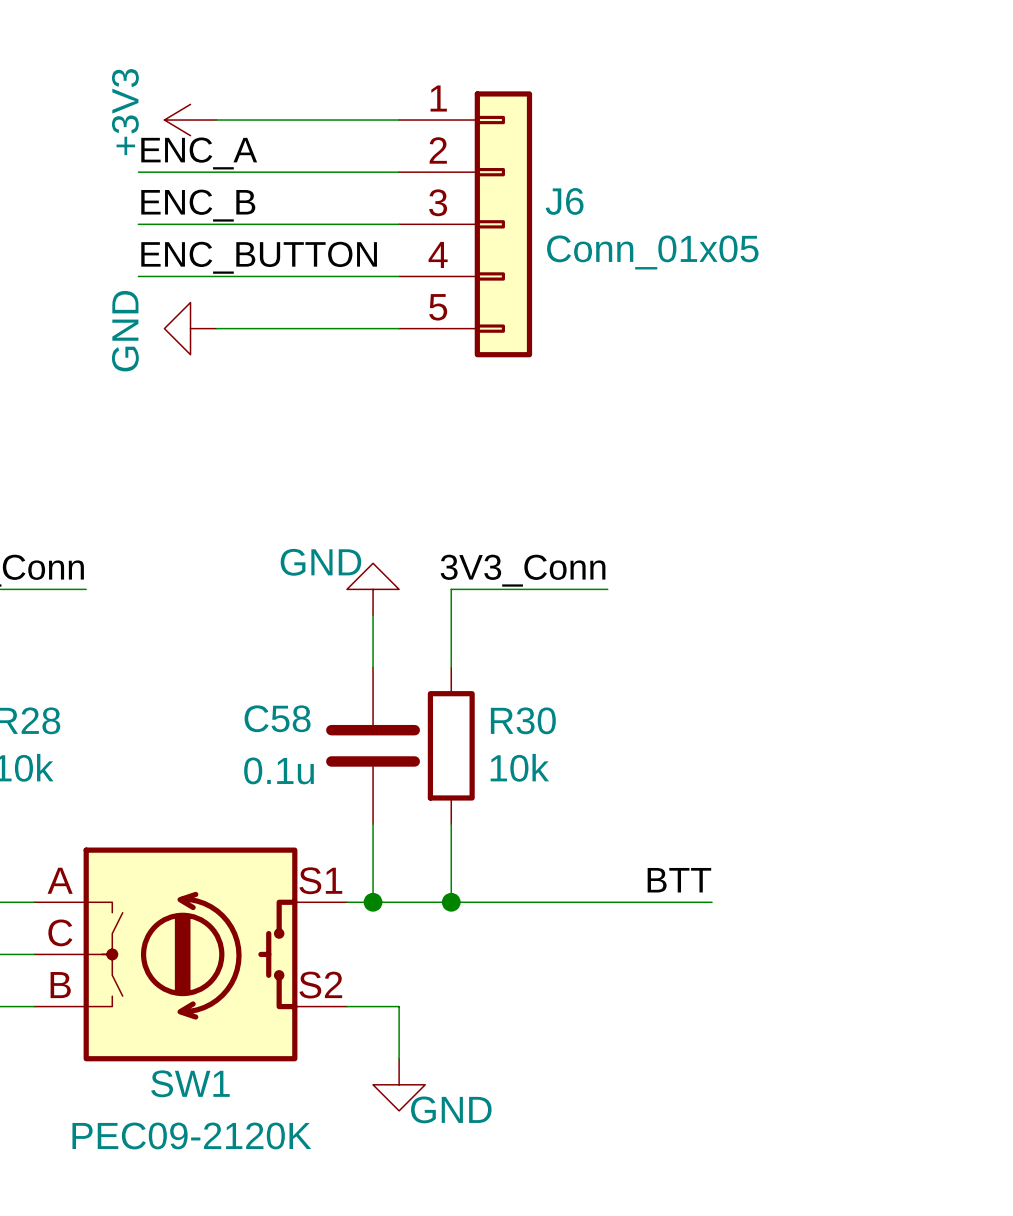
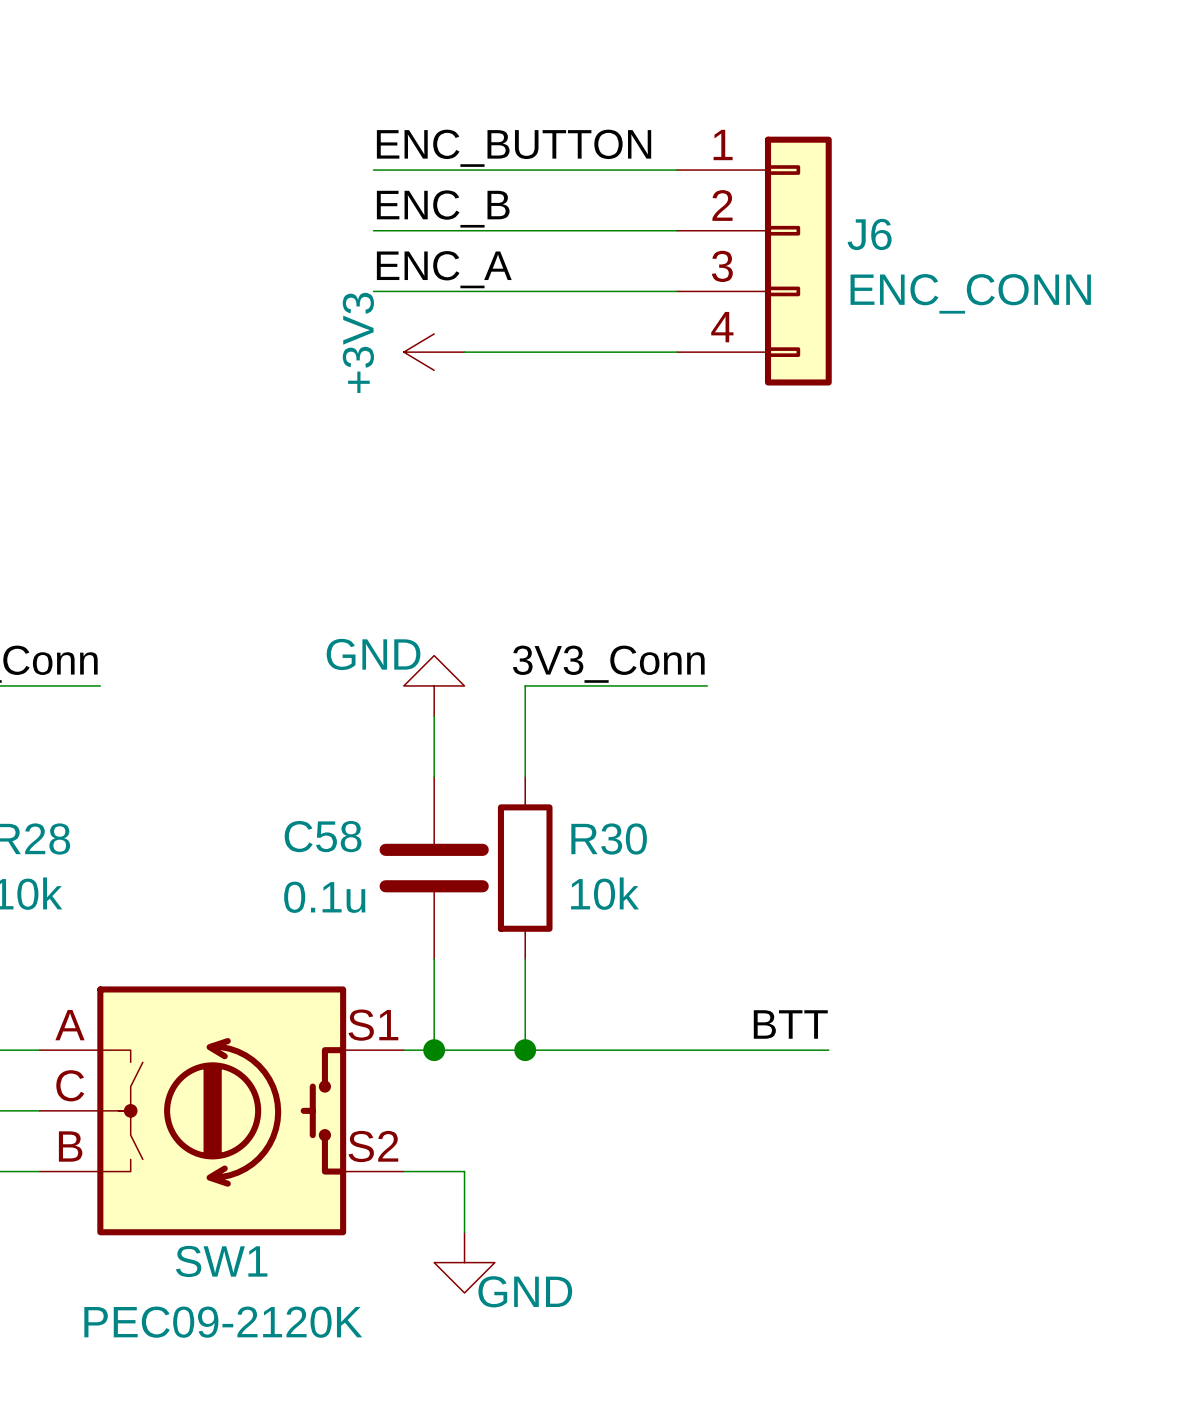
J6 symbol: [399, 91, 533, 358] -> [676, 136, 832, 386]
power symbol position: +3V3 (190, 120) -> +3V3 (434, 352)
wire: (216, 120) (399, 120) -> none
label position: ENC_A (199, 153) -> ENC_A (444, 269)
wire: (138, 172) (399, 172) -> (373, 170) (676, 170)
label position: ENC_B (198, 205) -> ENC_B (443, 208)
wire: (138, 224) (399, 224) -> (373, 230) (676, 230)
J6 value: Conn_01x05 (652, 252) -> ENC_CONN (970, 293)
label position: ENC_BUTTON (259, 257) -> ENC_BUTTON (514, 148)
wire: (138, 276) (399, 276) -> (373, 291) (676, 291)
power symbol: GND (190, 328) -> none
wire: (216, 328) (399, 328) -> (464, 352) (676, 352)

